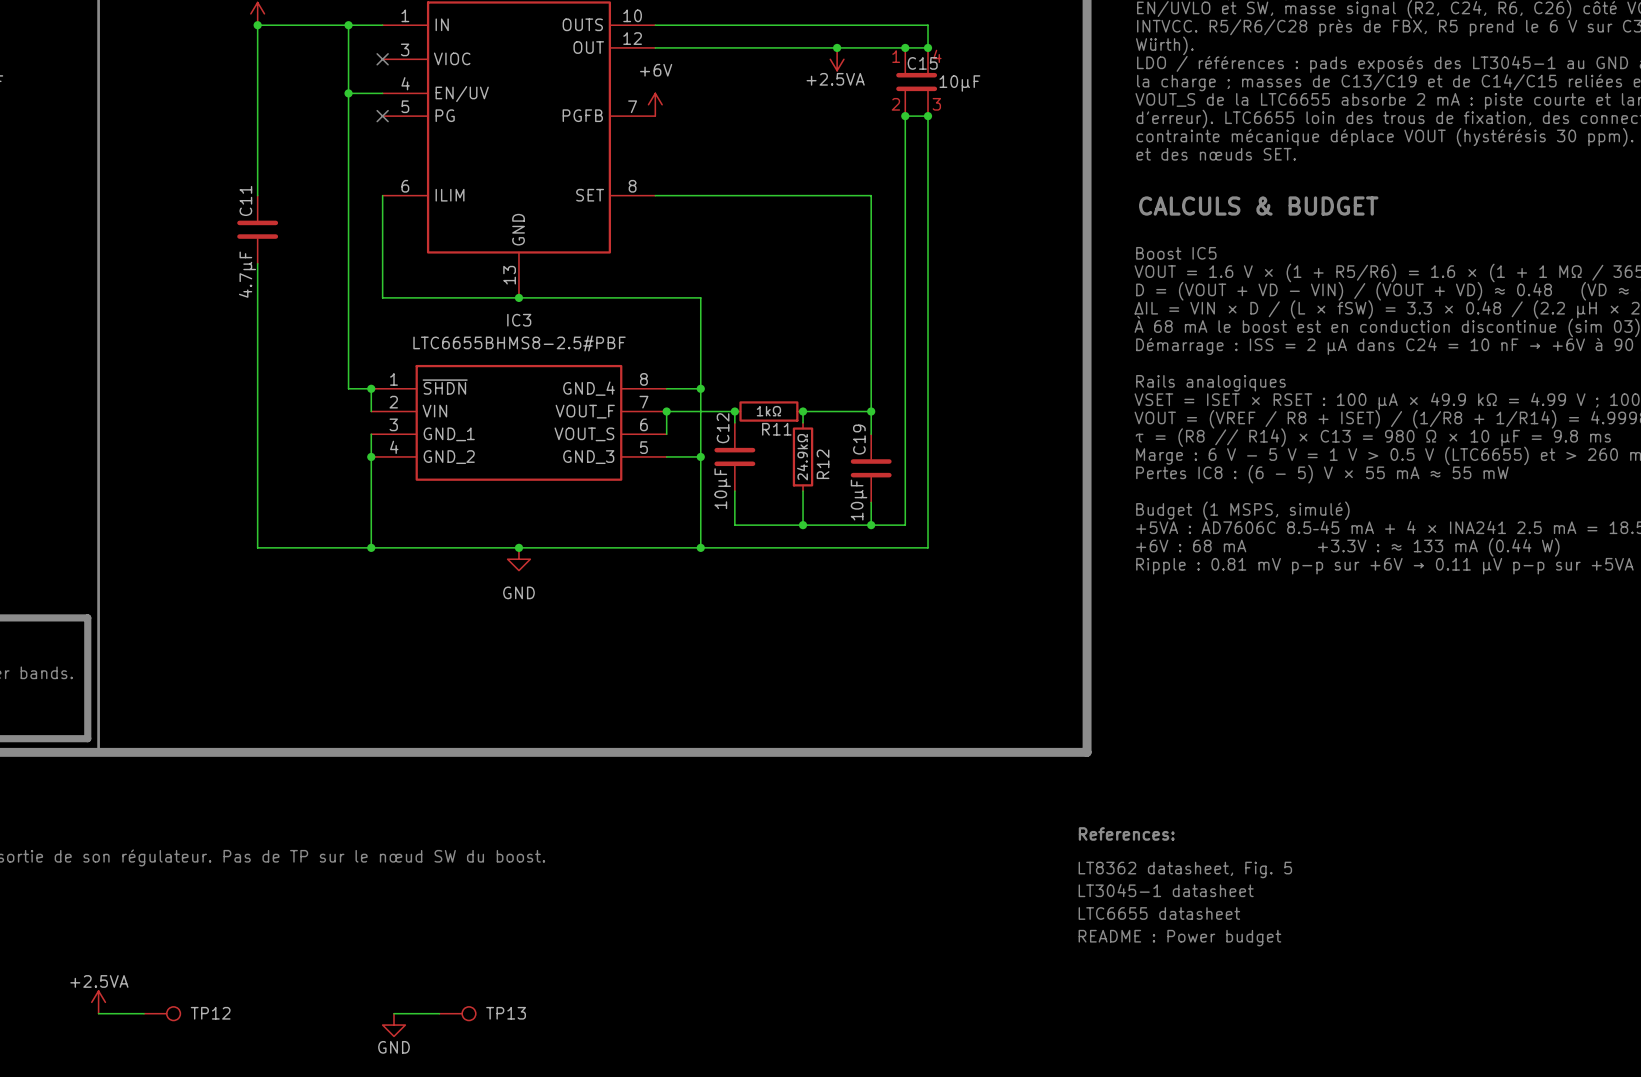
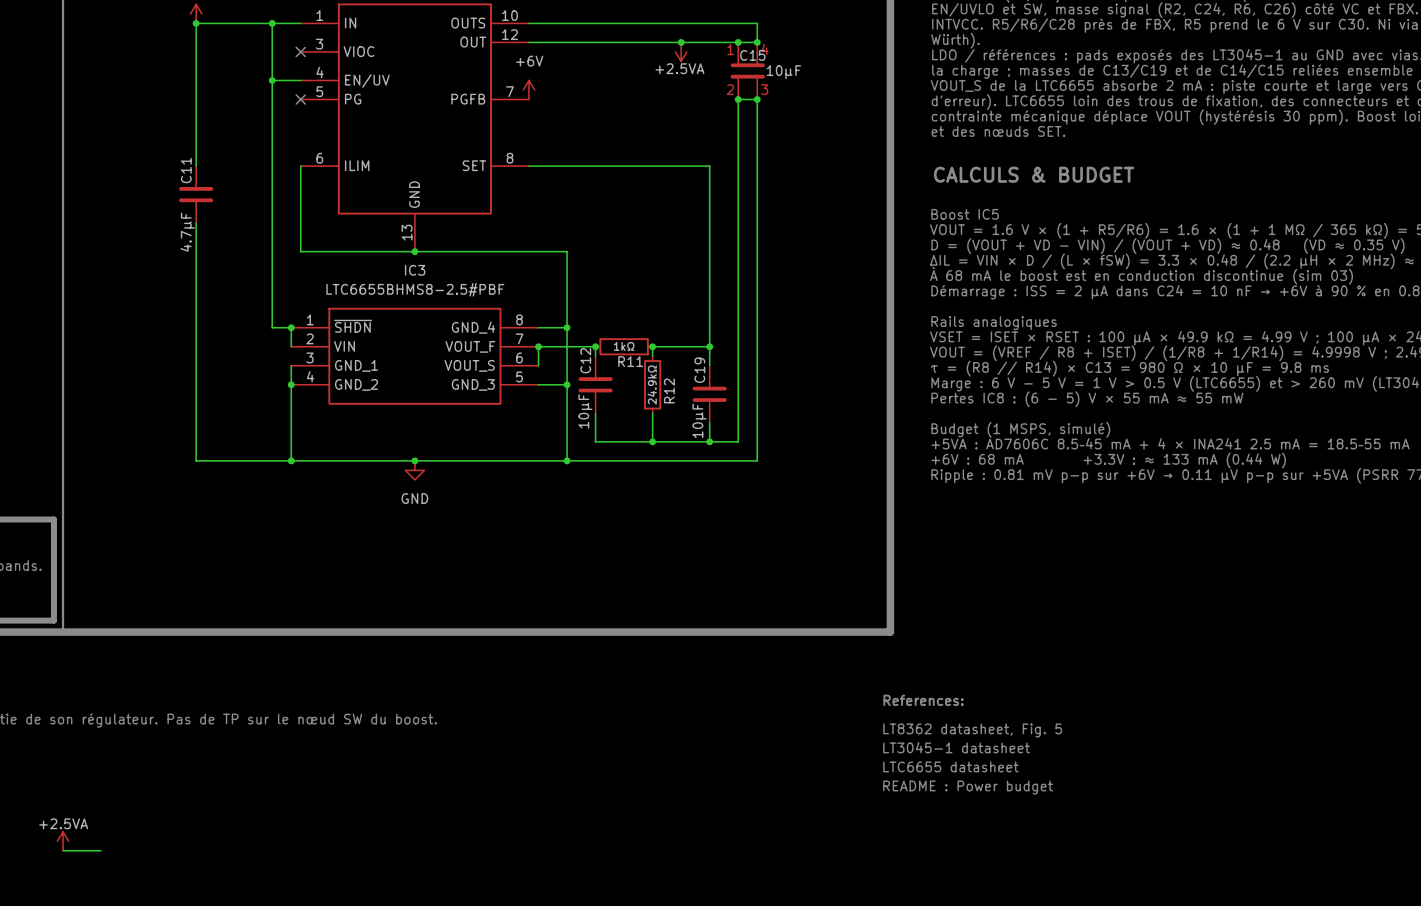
TP12: (162, 1013) -> none
wire: (393, 1013) (439, 1013) -> none
TP13: (457, 1013) -> none
power symbol: GND (393, 1025) -> none

